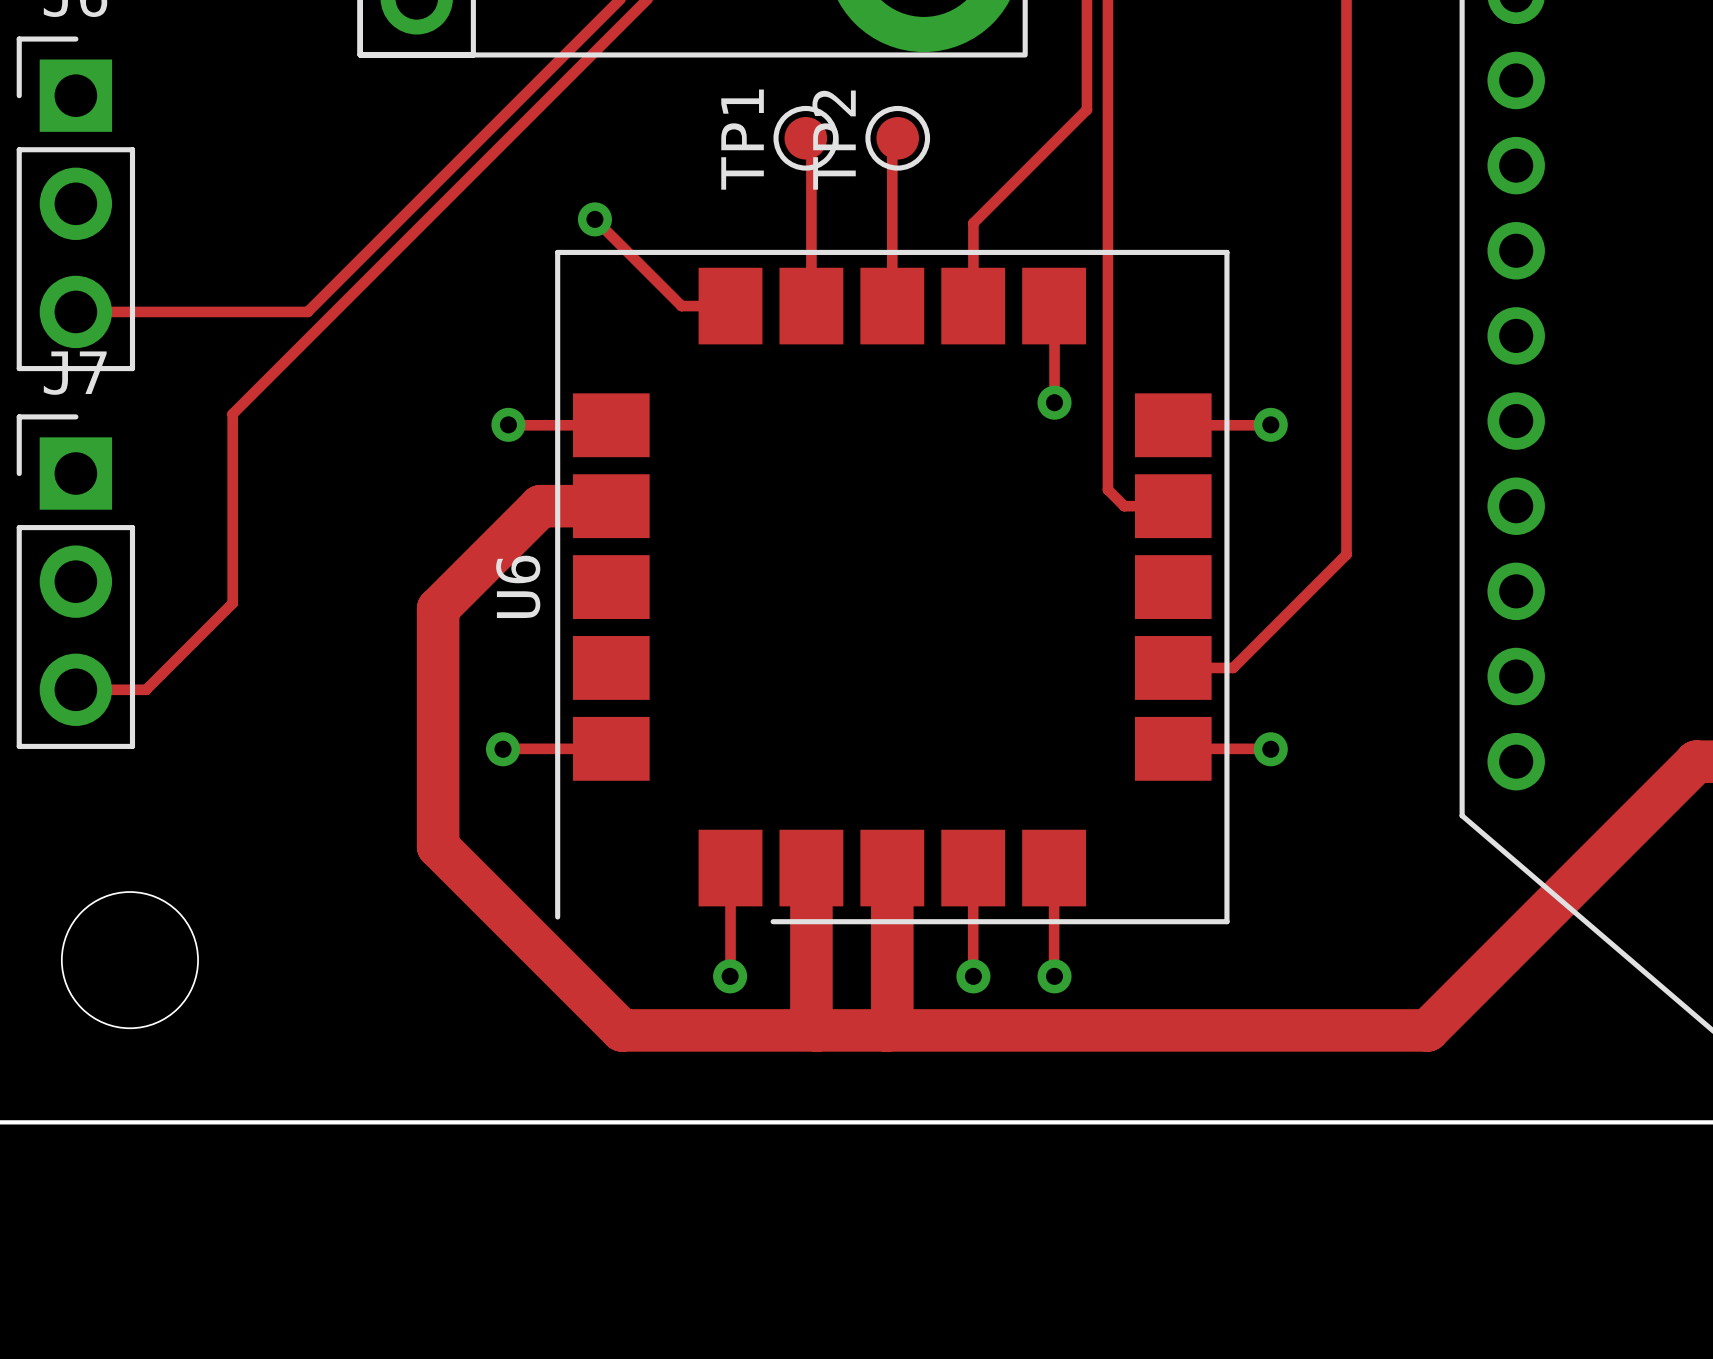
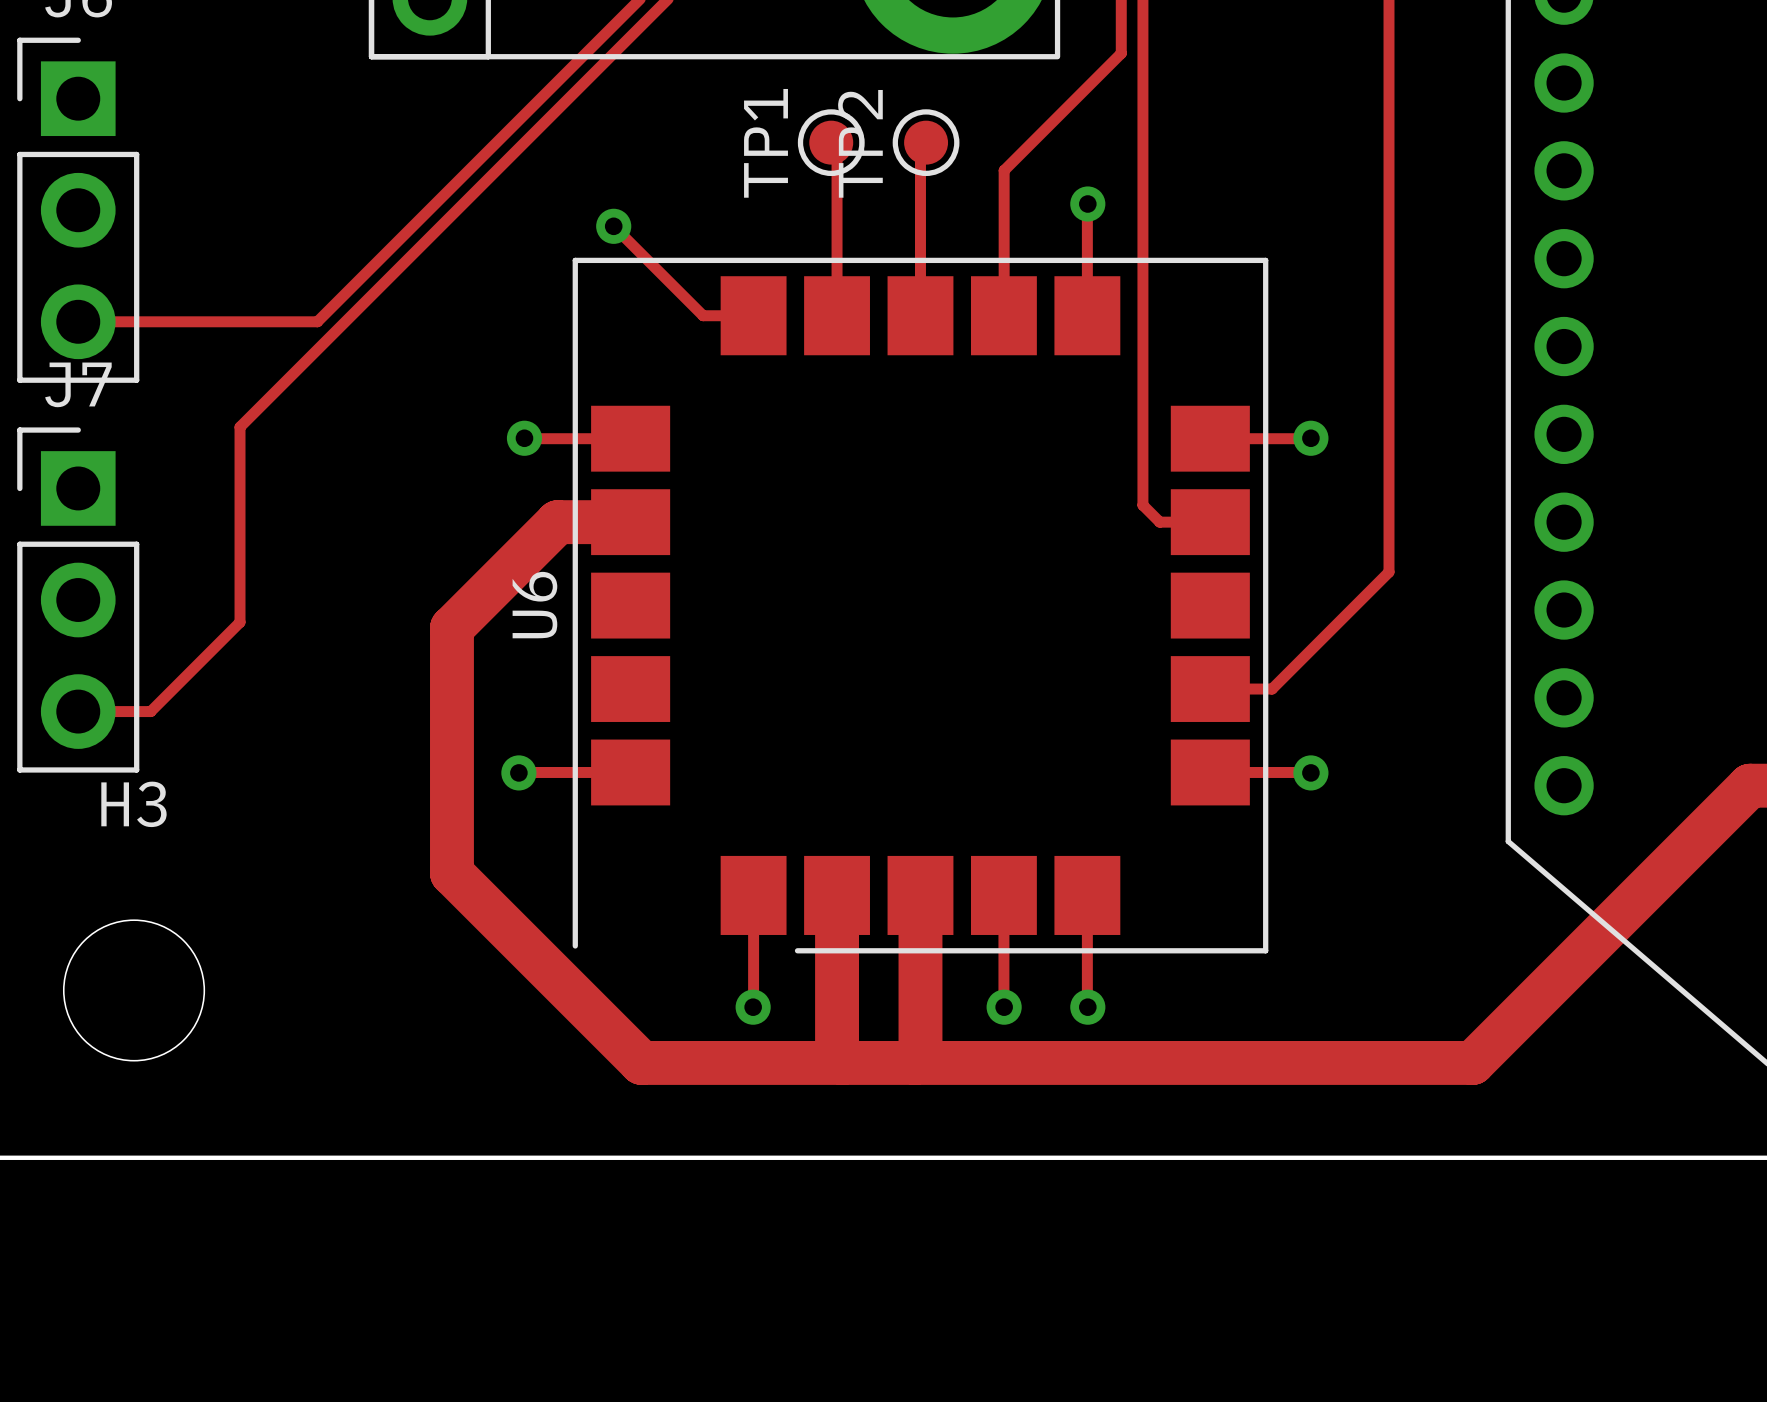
track: (1086, 51) (1086, 109) (973, 223) -> (1121, 53) (1004, 170) (1004, 230)
track: (1054, 306) (1054, 402) -> (1087, 315) (1087, 204)
via position: (1054, 402) -> (1087, 204)
H3 name: none -> H3 (133, 804)

